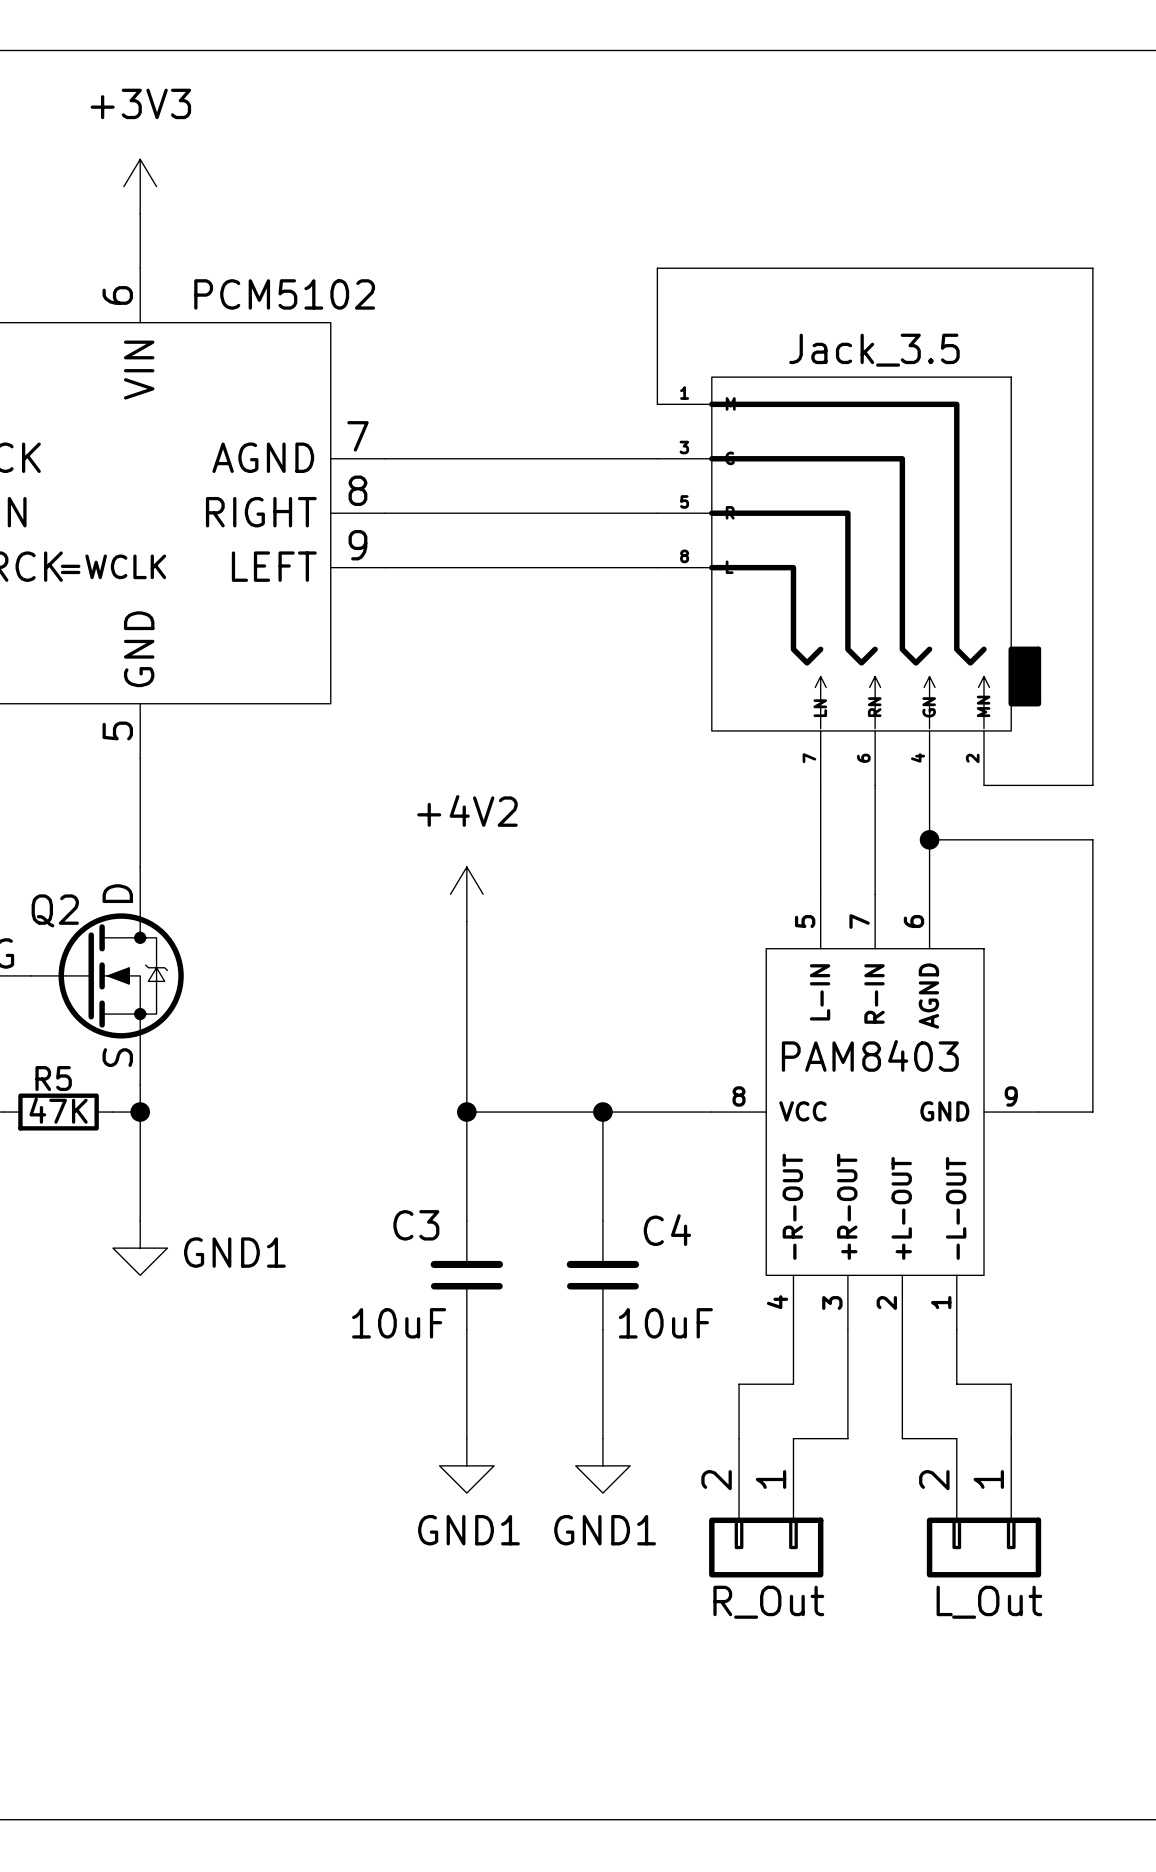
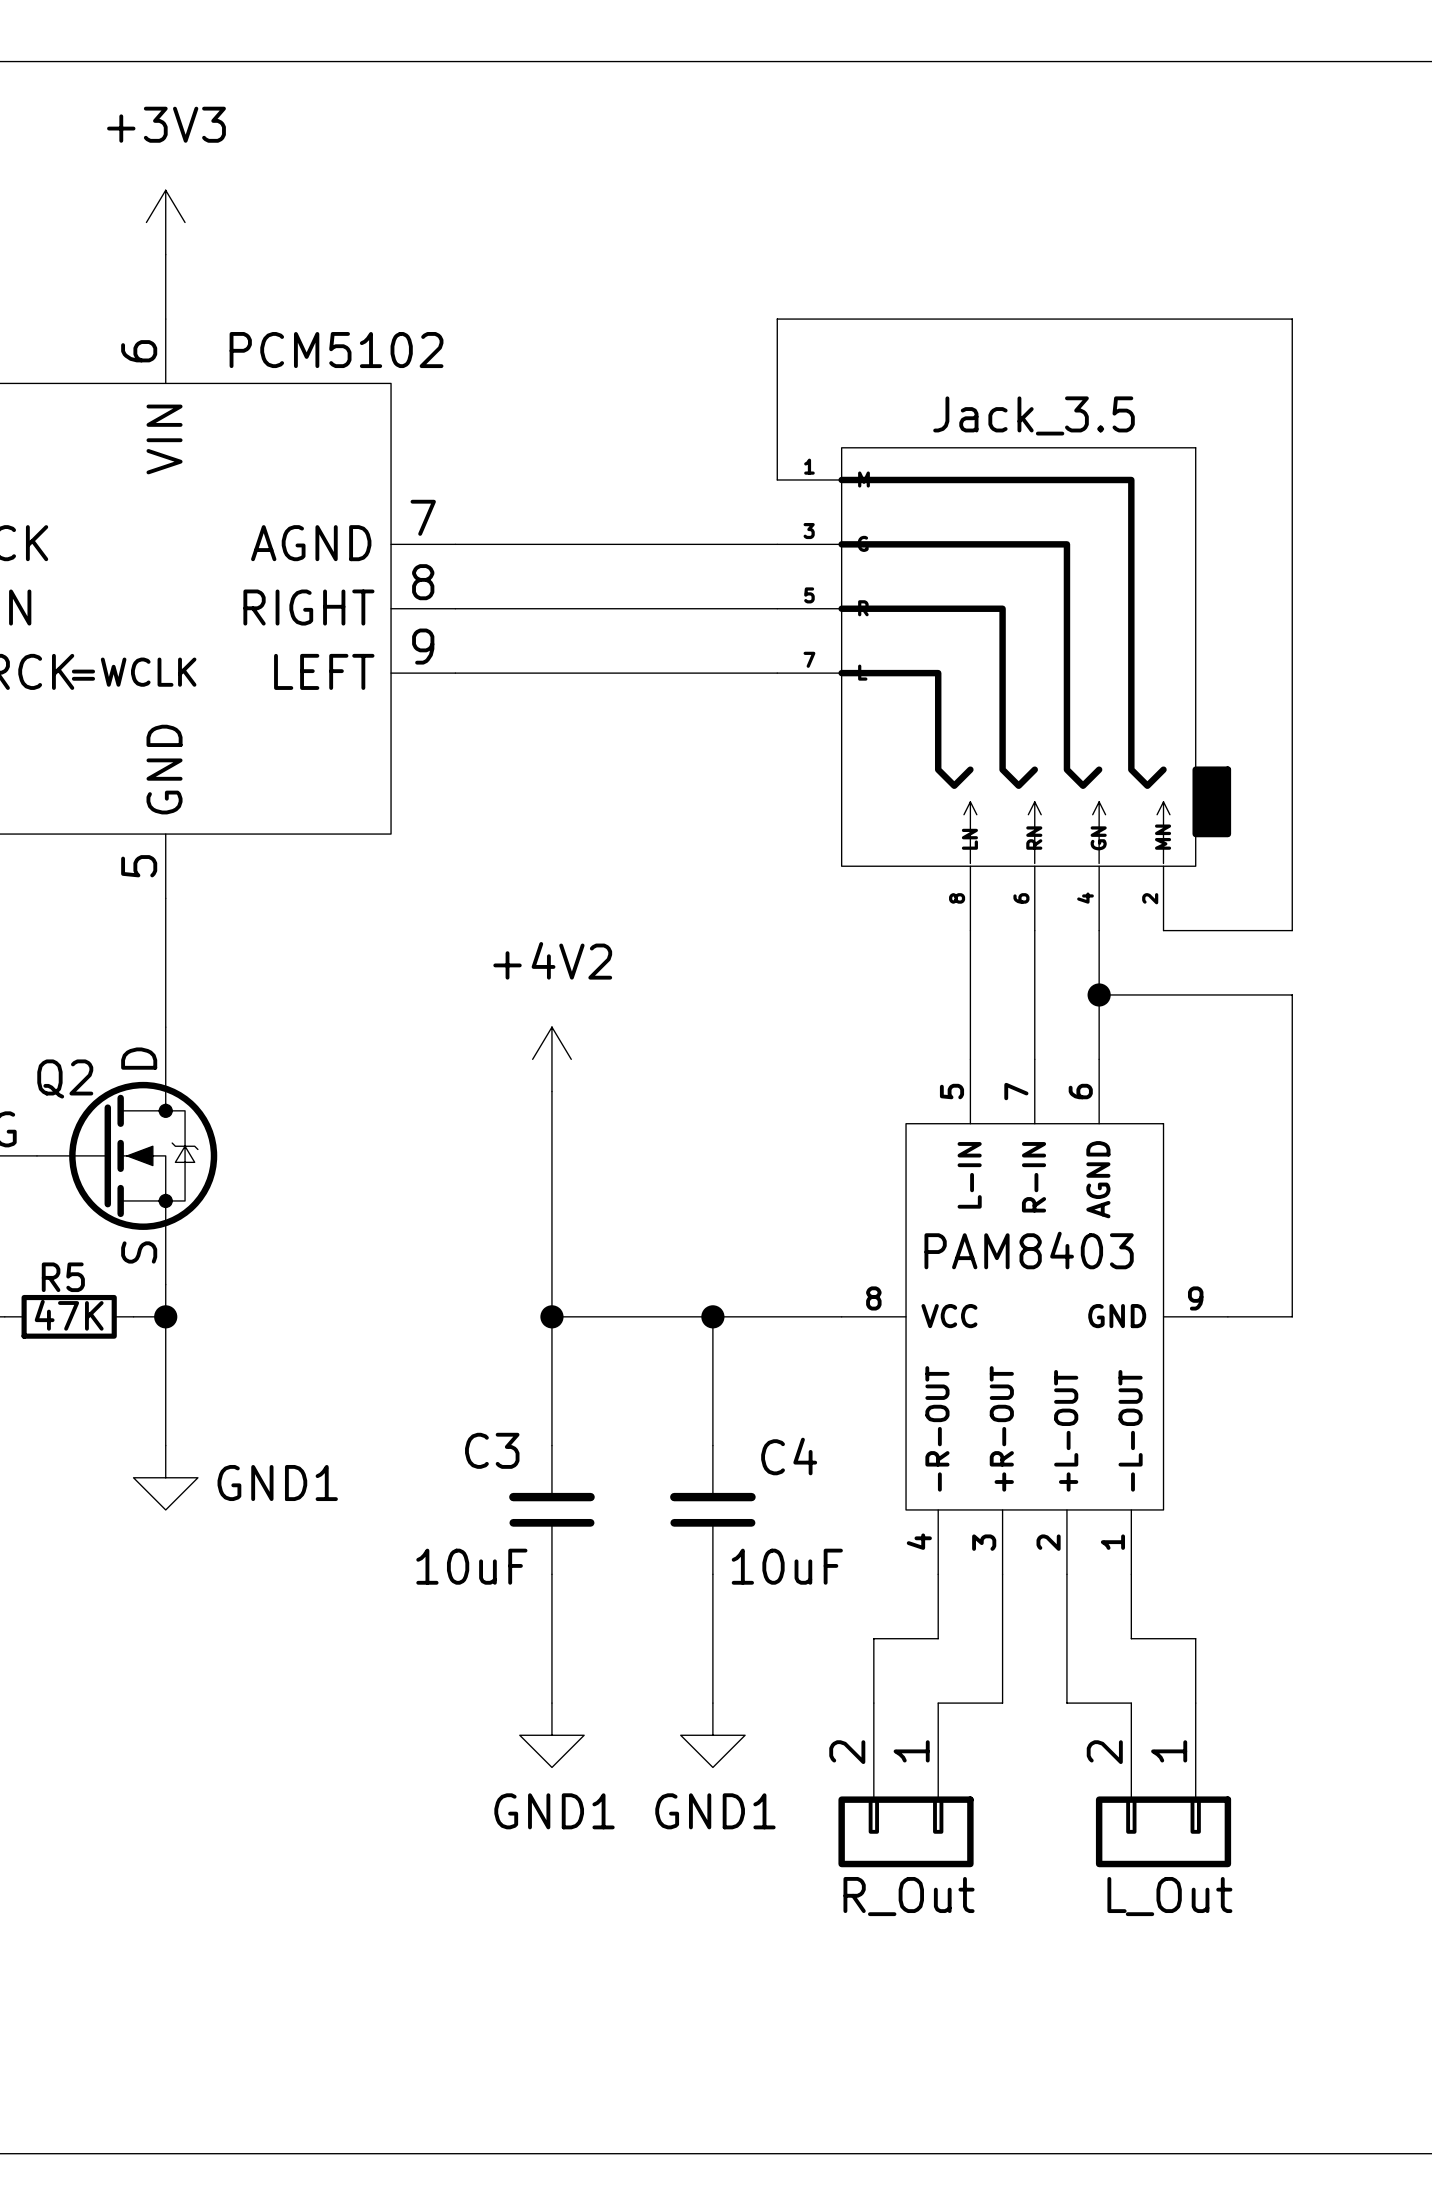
part pin number: 8 (684, 556) -> 7 (809, 659)
part pin number: 7 (809, 758) -> 8 (957, 898)

